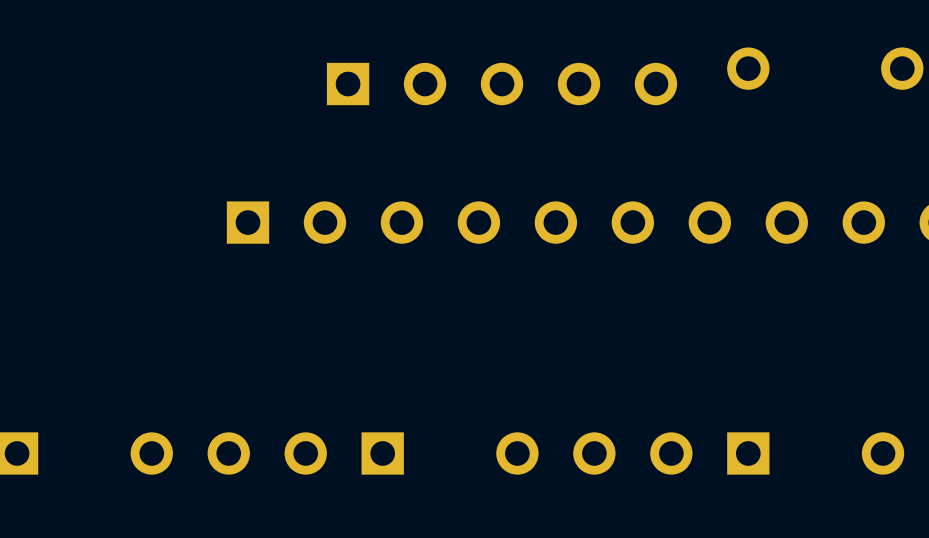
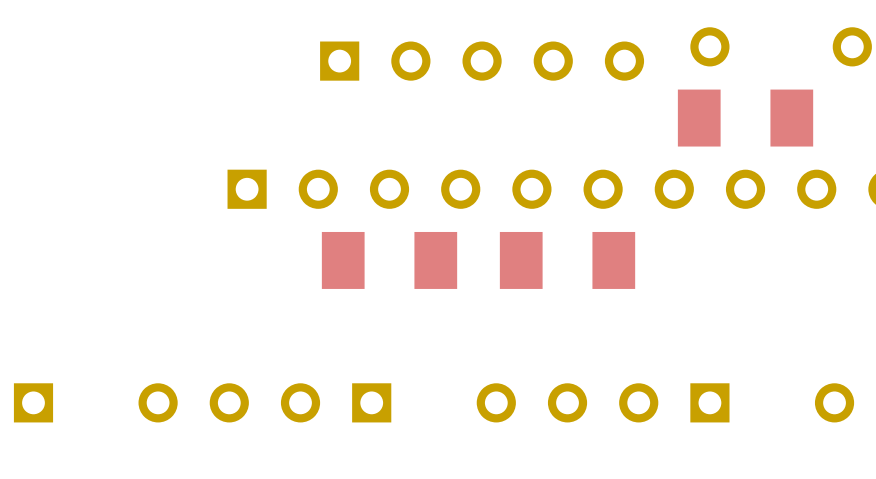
part: none -> (745, 118)
part: none -> (389, 260)
part: none -> (567, 260)

